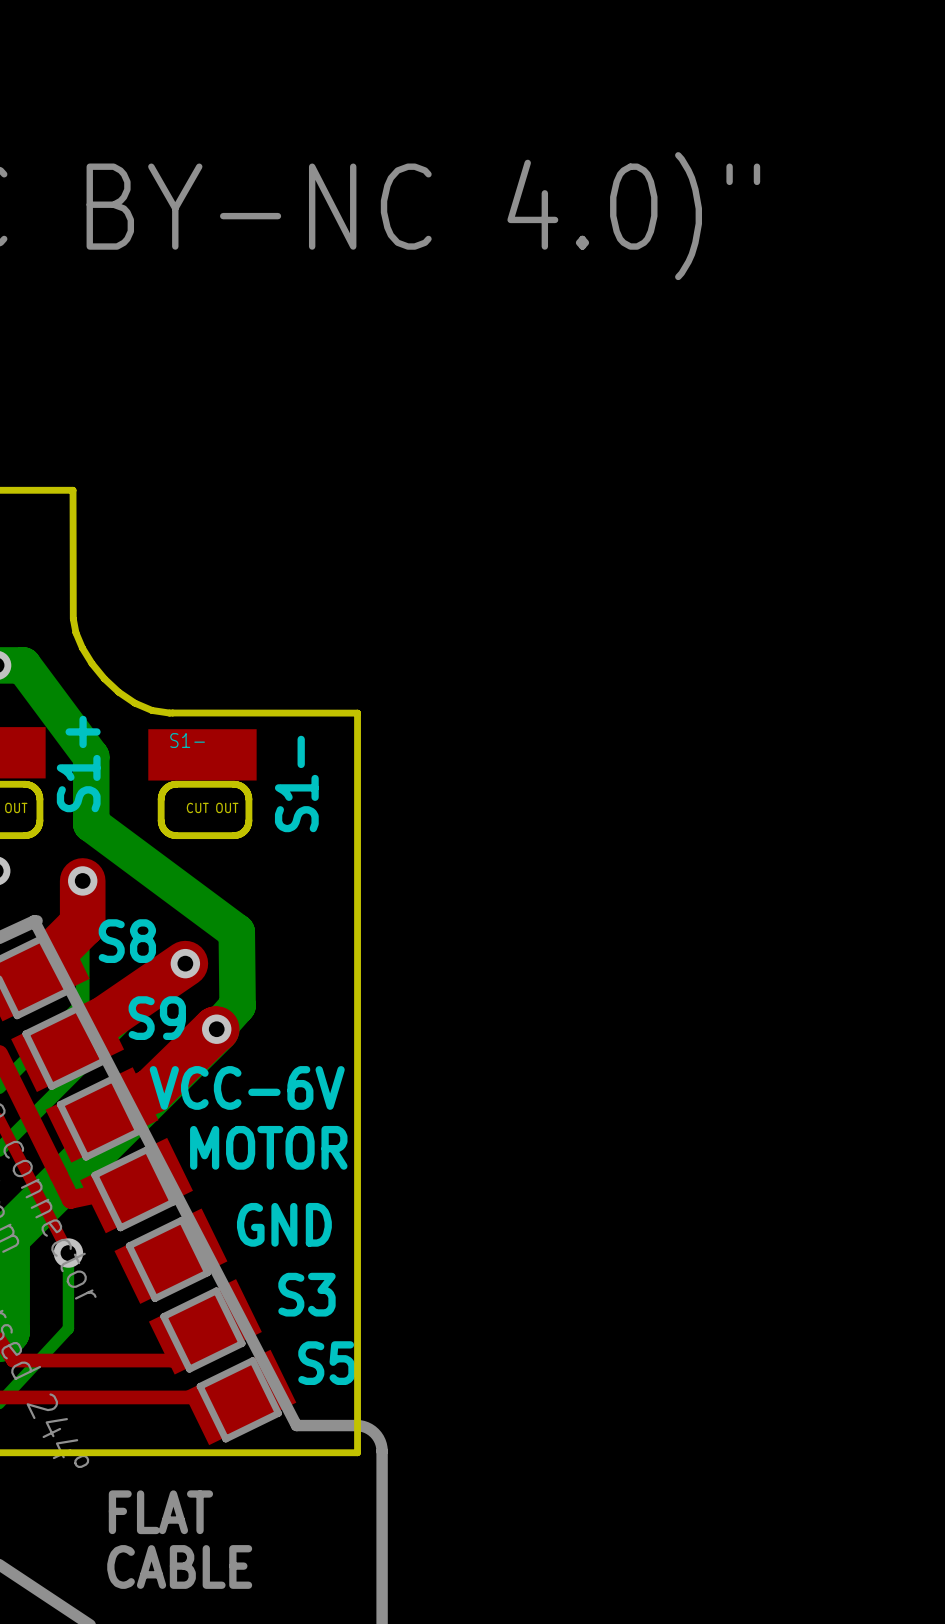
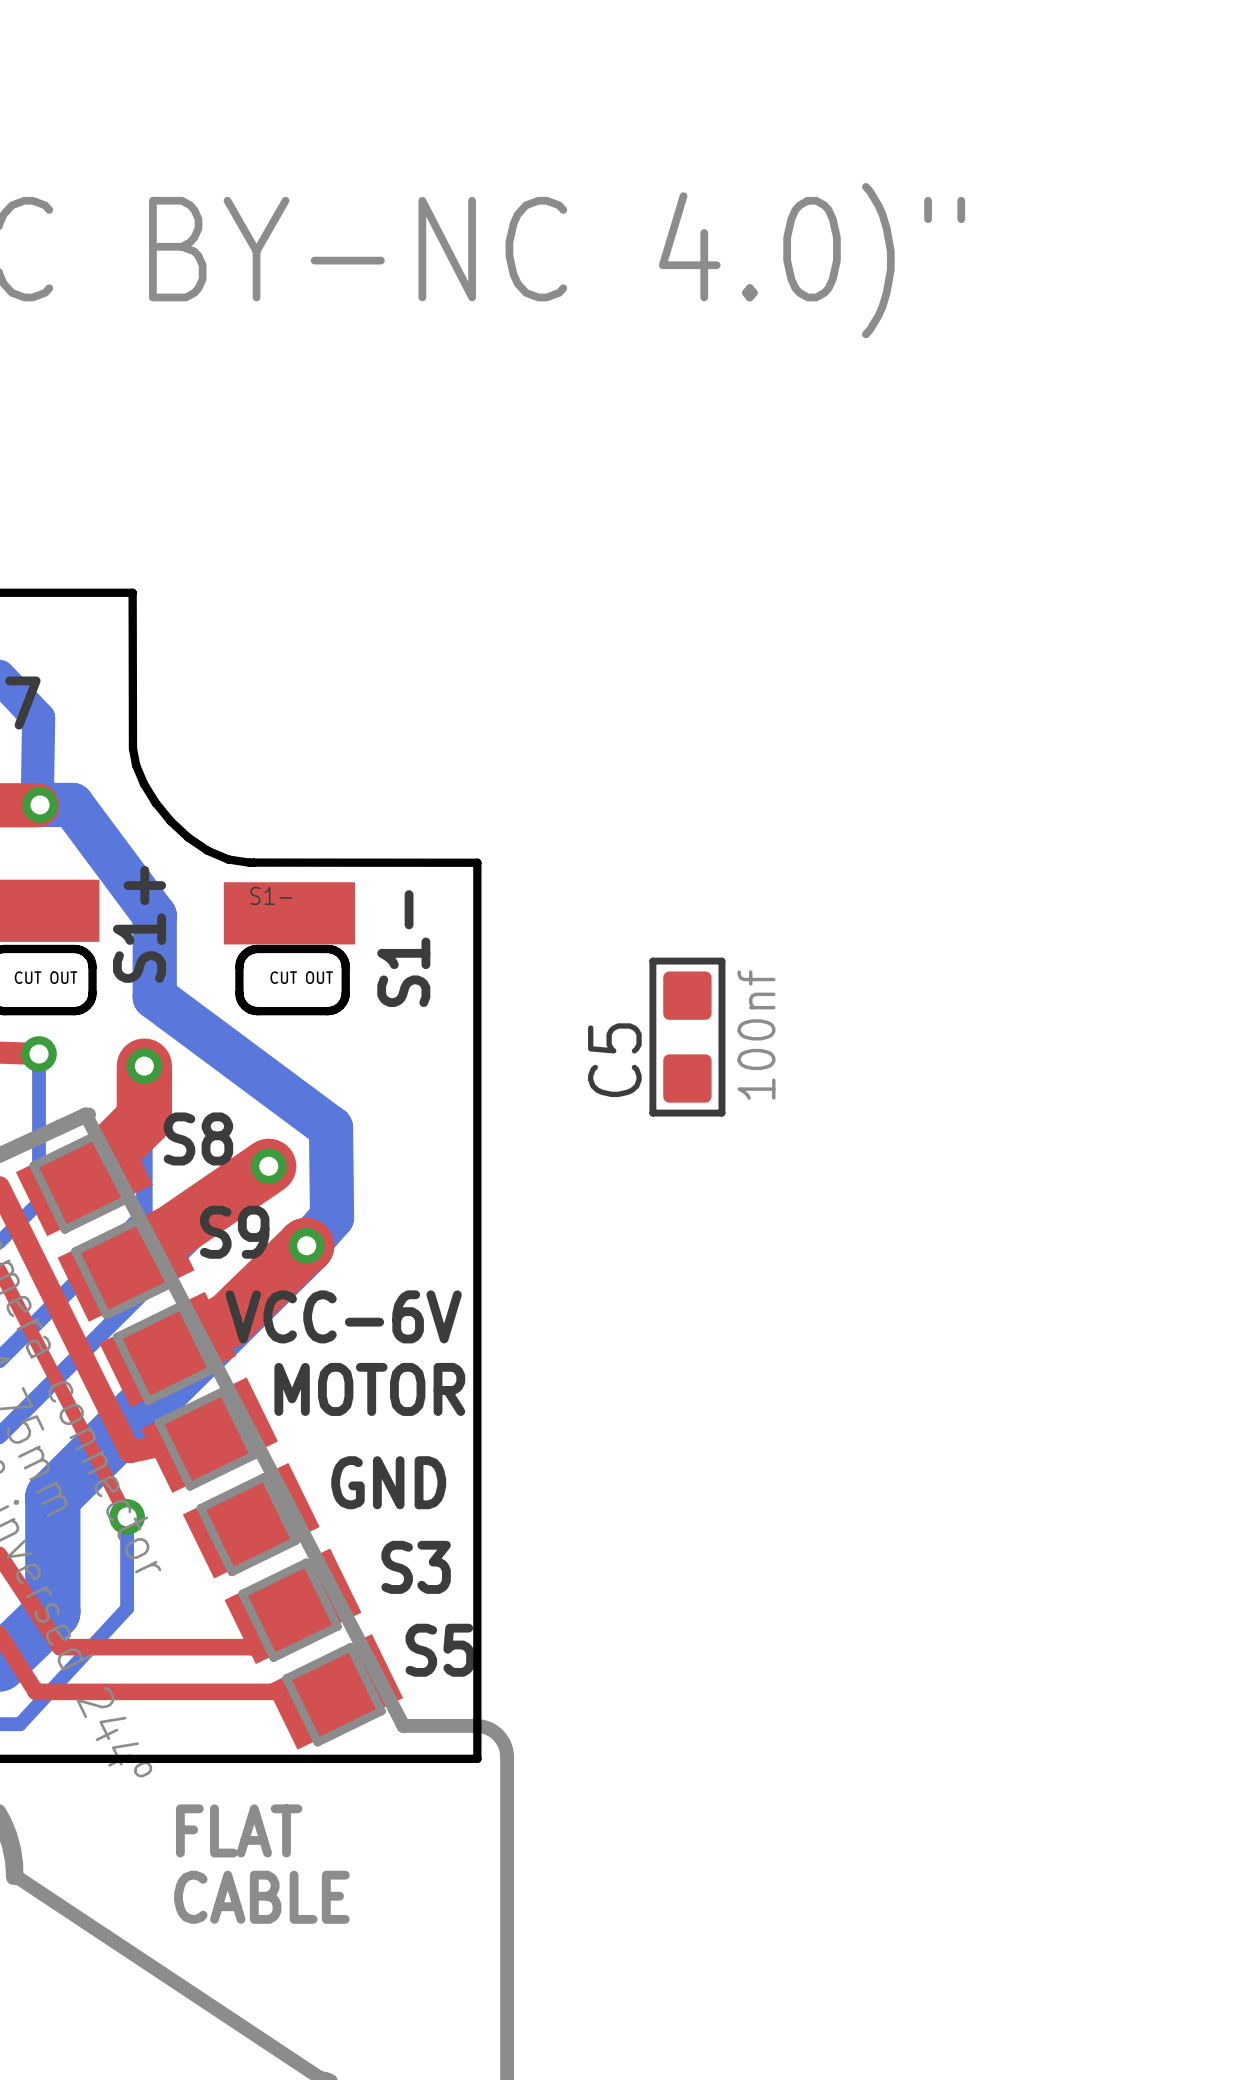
C5: none -> 100nf (687, 1037)

